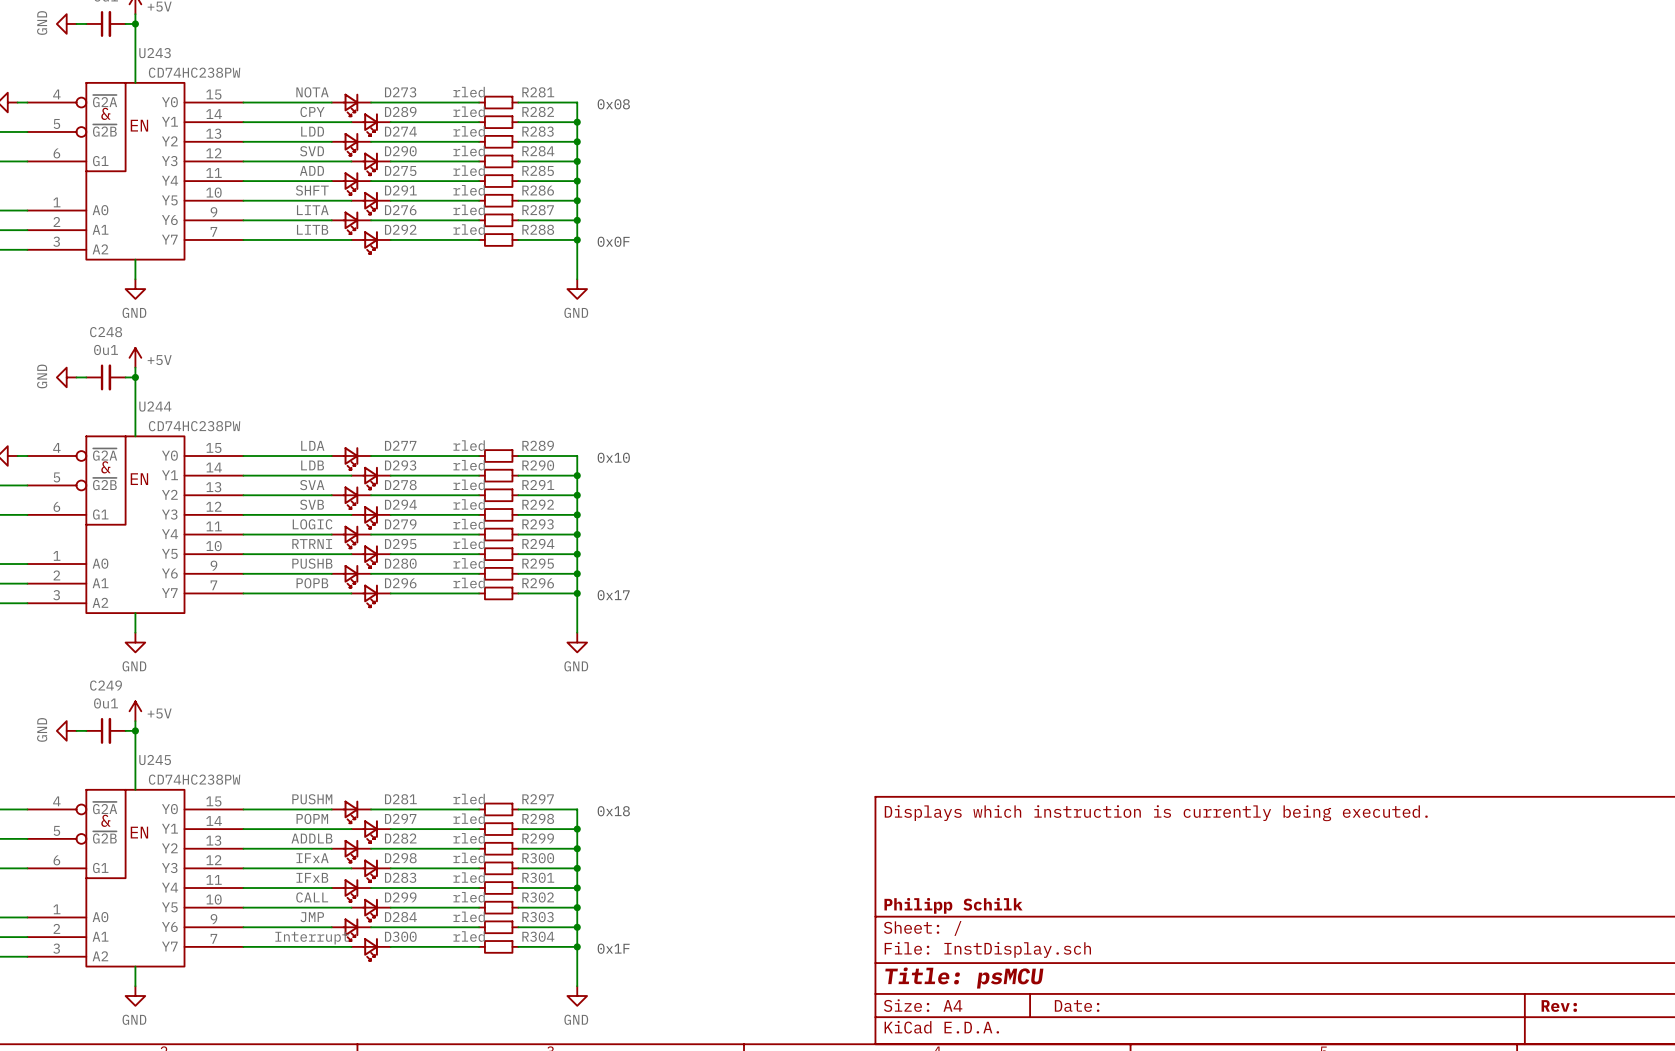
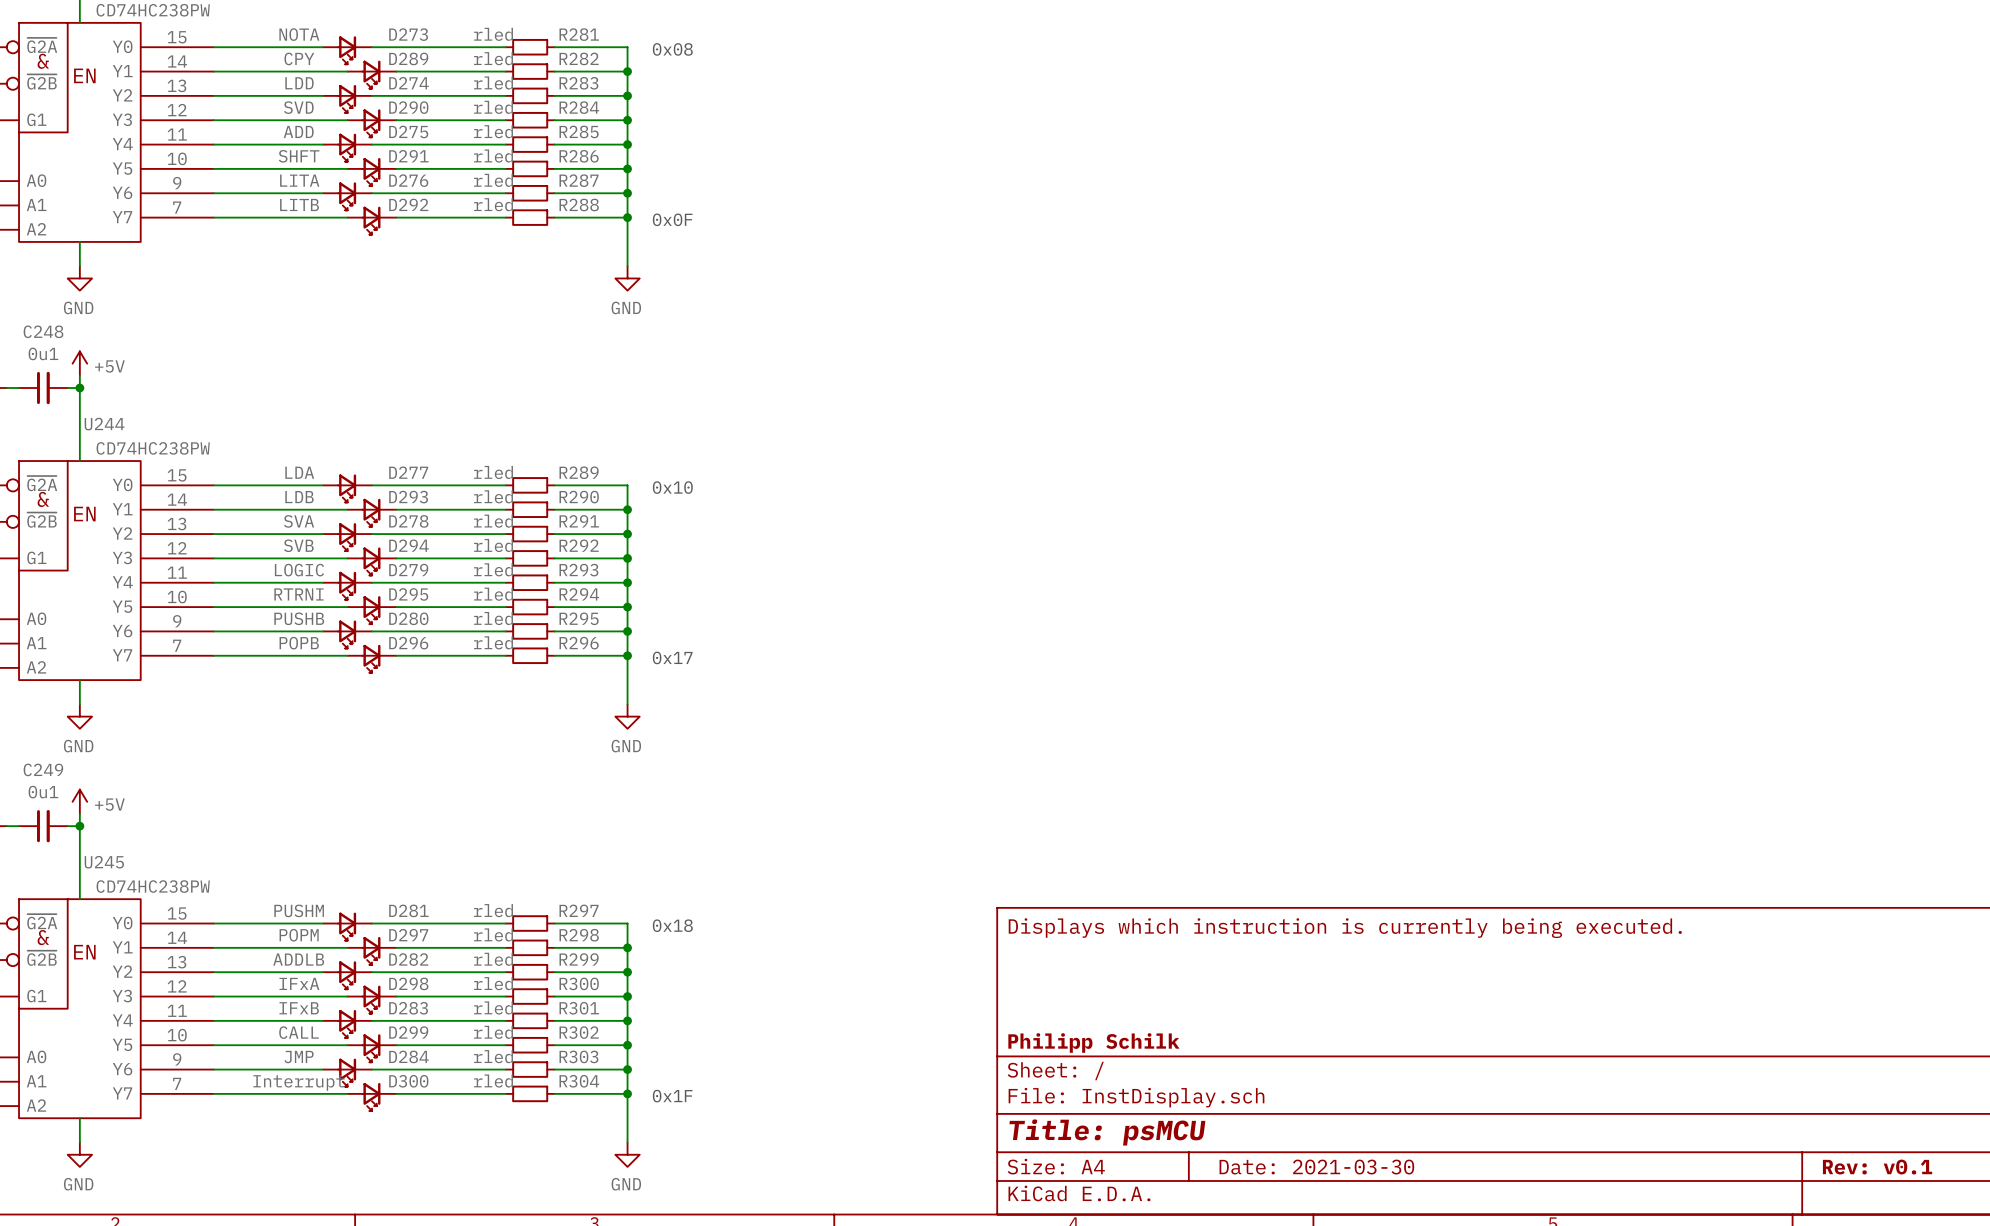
title block: Date: (1077, 1006) -> Date: 2021-03-30 (1316, 1167)
title block: Rev: (1559, 1006) -> Rev: v0.1 (1877, 1167)

